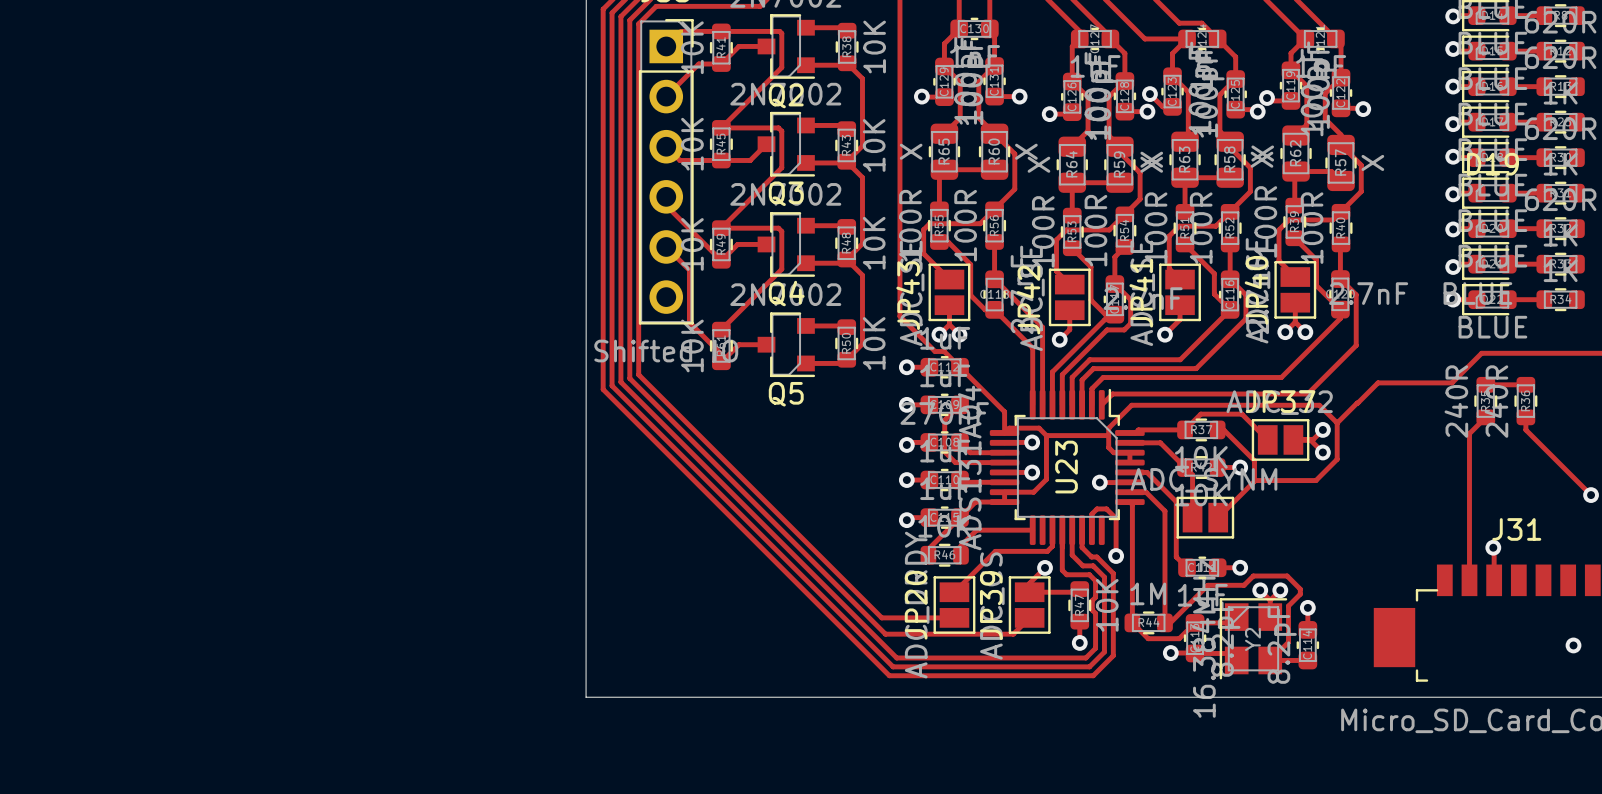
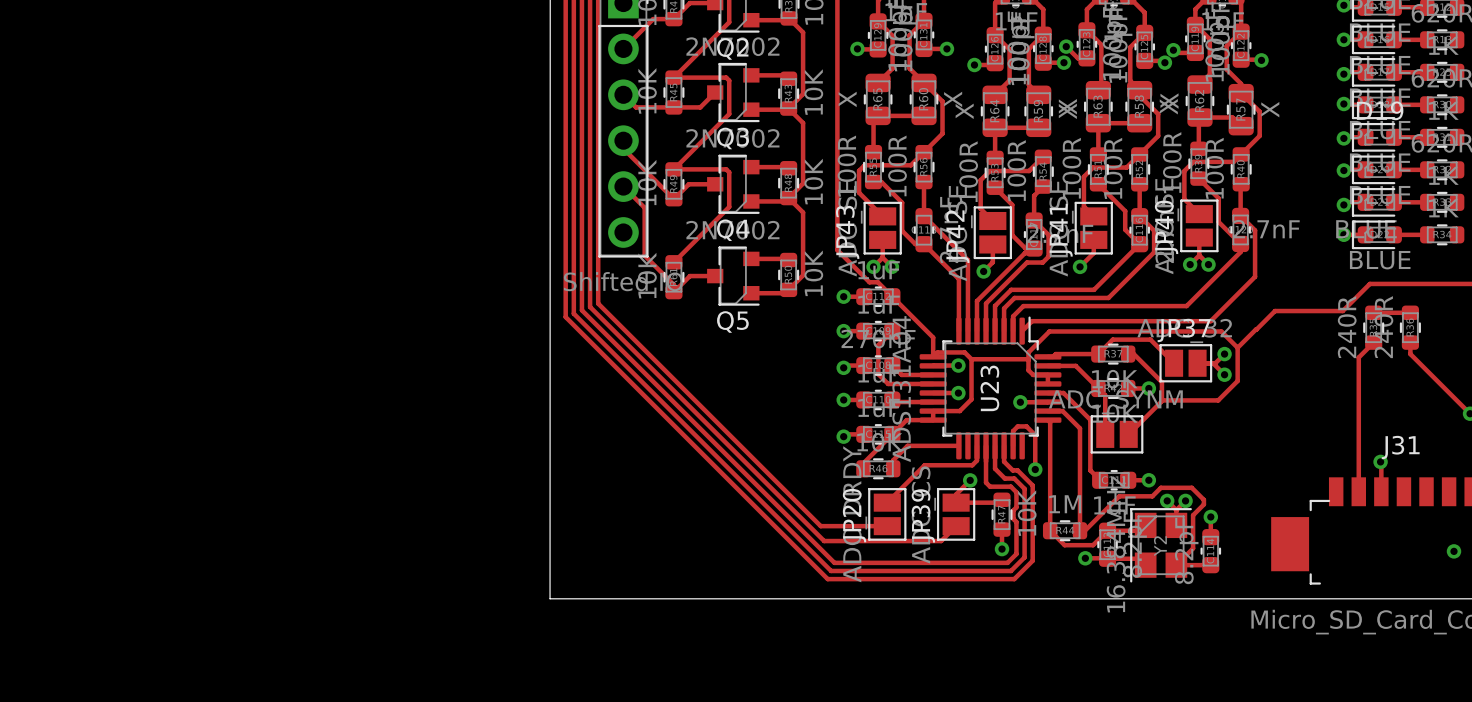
track: (1119, 146) (1119, 152) (1140, 172) (1140, 199) (1124, 214) -> none

